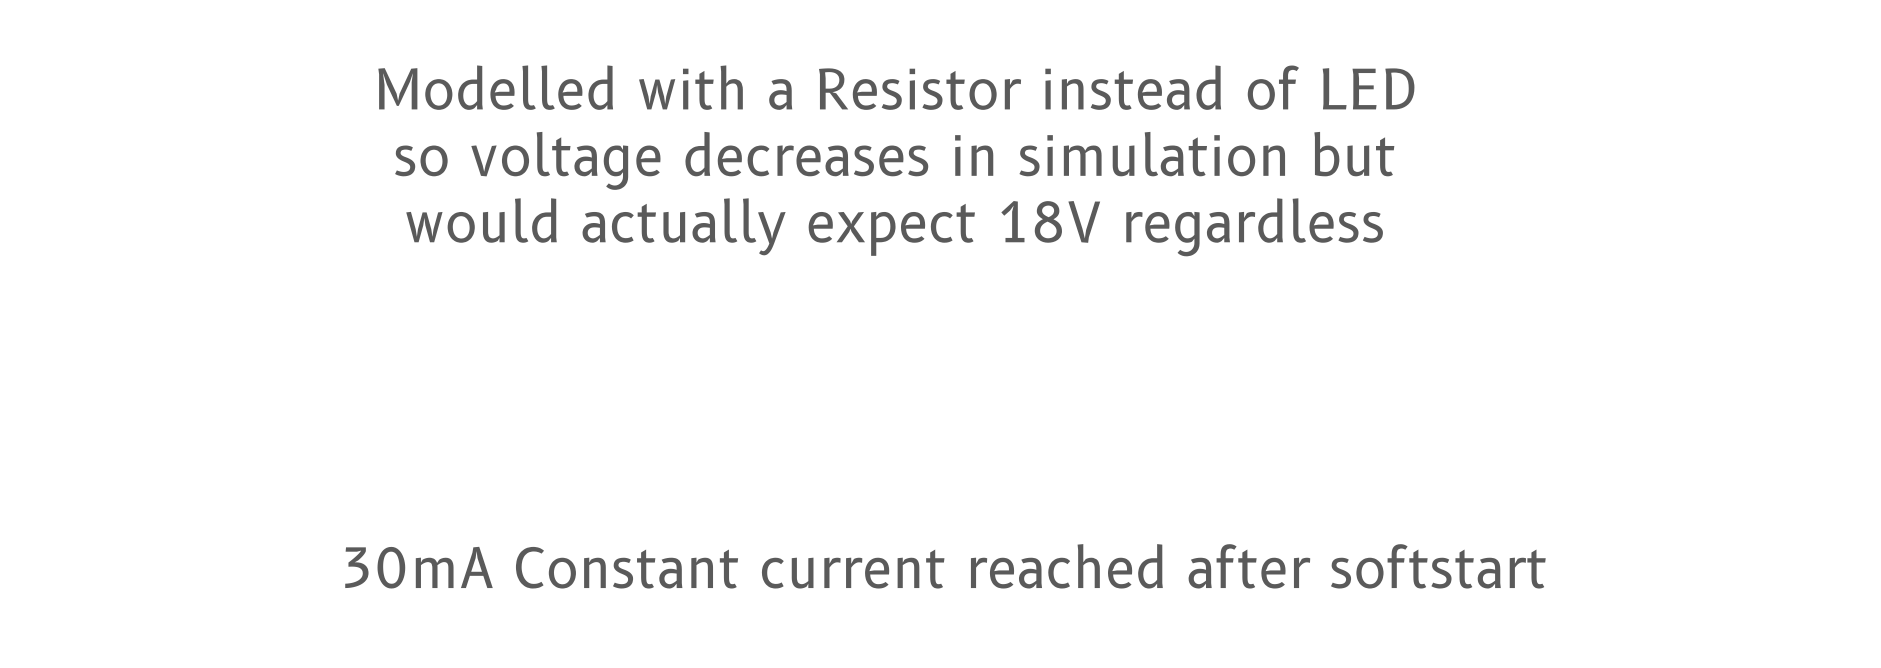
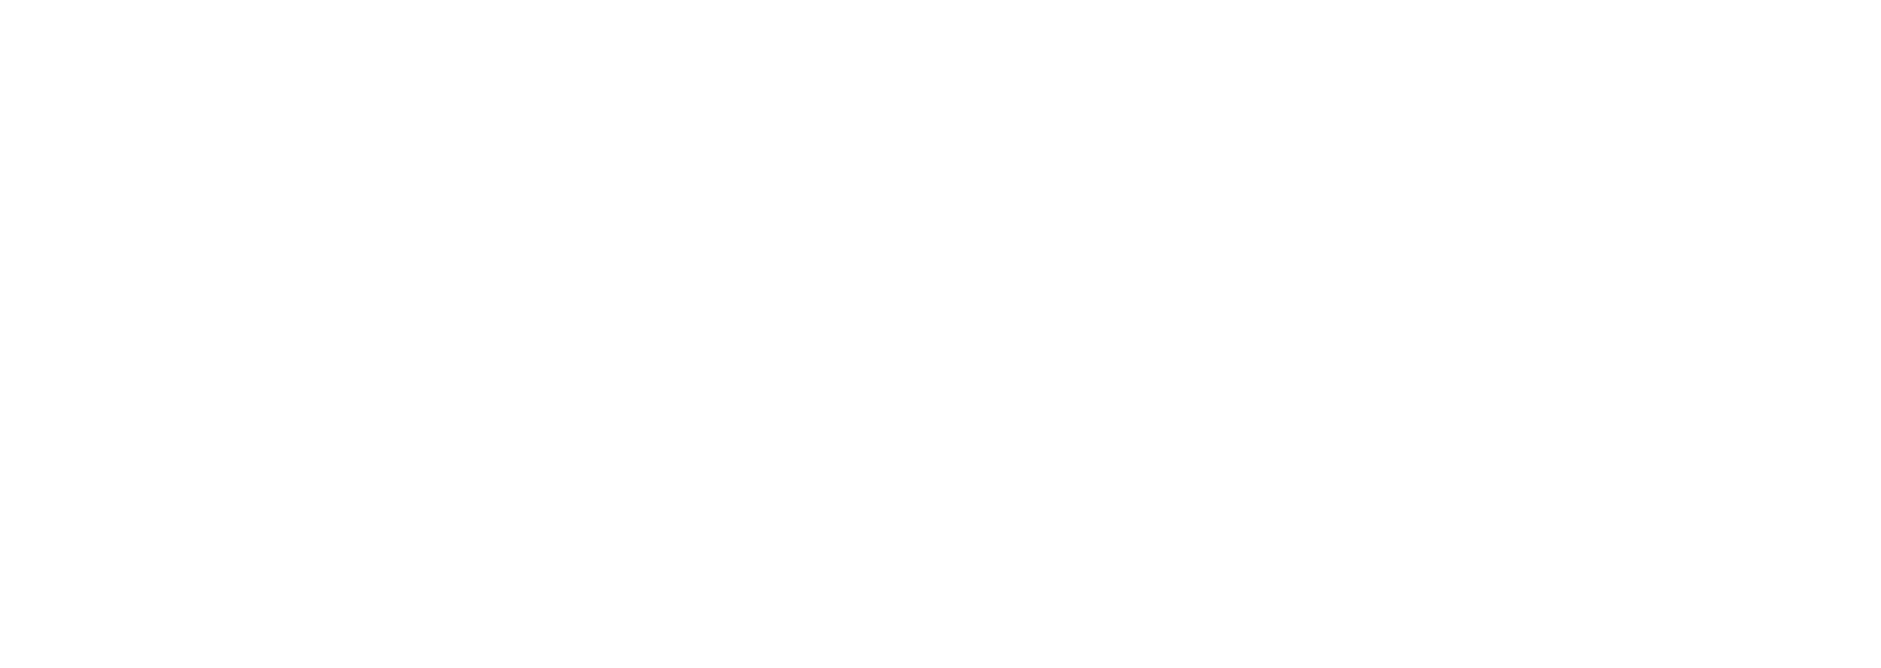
text: Modelled with a Resistor instead of LED (896, 87) -> none
text: so voltage decreases in simulation but (894, 160) -> none
text: would actually expect 18V regardless (894, 227) -> none
text: 30mA Constant current reached after softstart (945, 566) -> none

